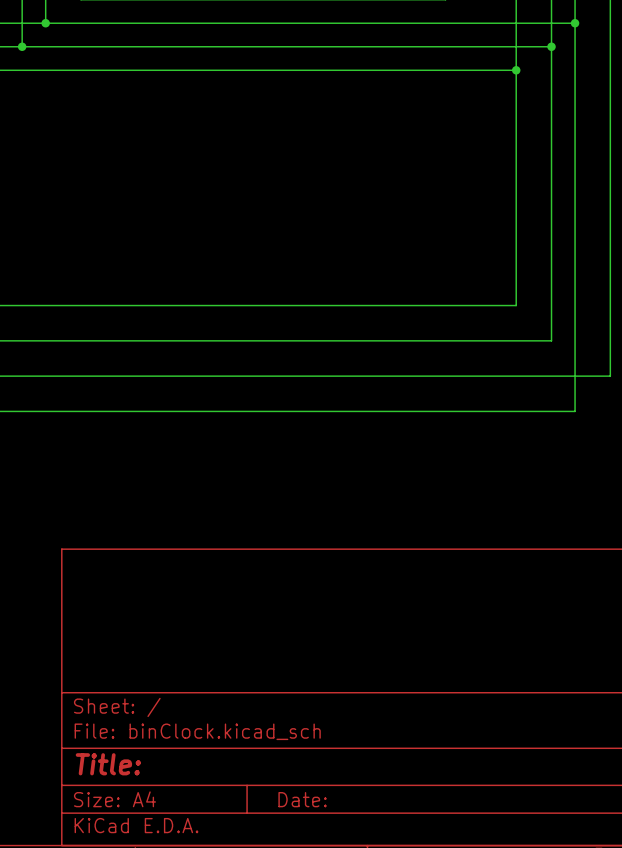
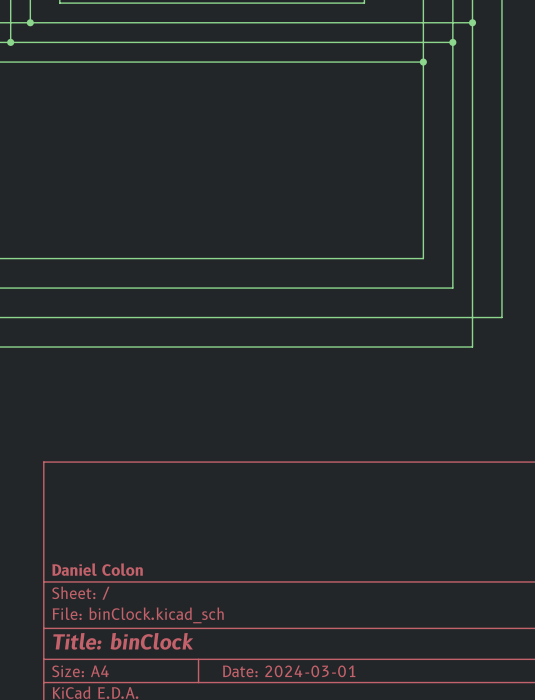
title block: none -> Daniel Colon (97, 569)
title block: Title: (108, 764) -> Title: binClock (123, 641)
title block: Date: (302, 799) -> Date: 2024-03-01 (289, 671)

